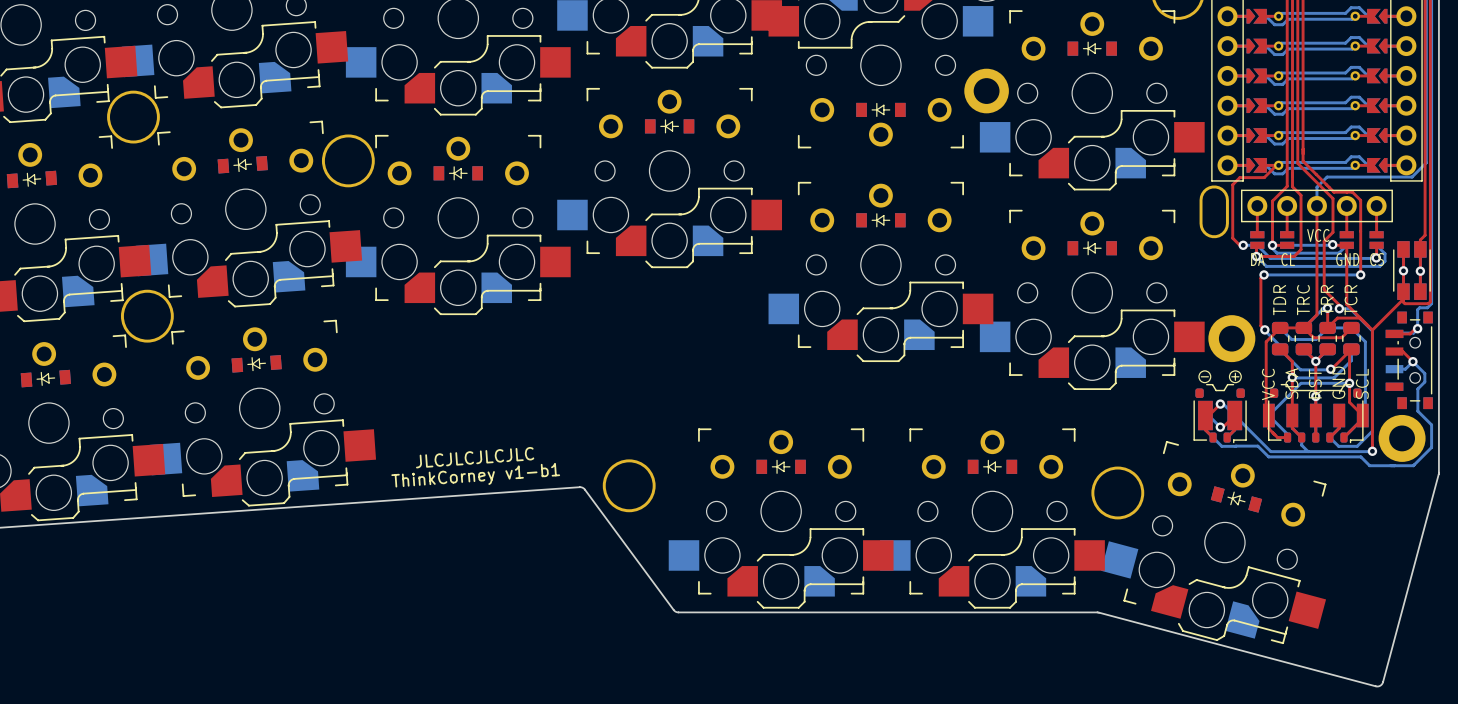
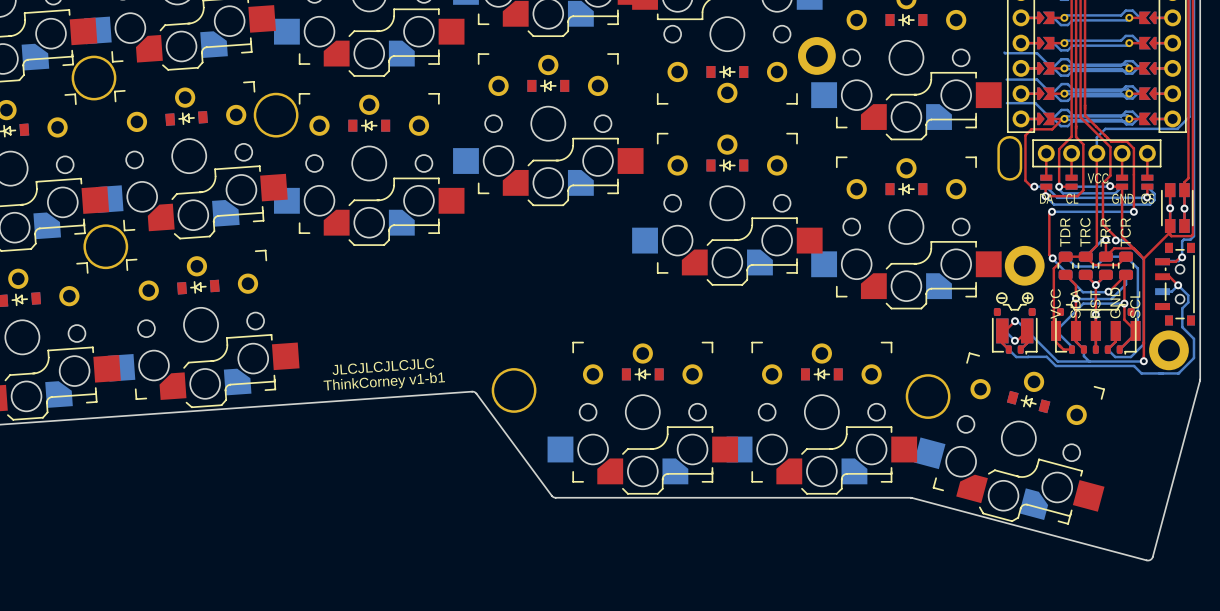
bottom track: none -> (1004, 52) (1037, 53) (1049, 66)
bottom track: none -> (1054, 66) (1061, 59) (1067, 59) (1072, 64) (1127, 64) (1129, 66)
bottom track: none -> (1064, 66) (1067, 69) (1121, 69) (1126, 73) (1132, 73) (1139, 66)
bottom track: none -> (1006, 79) (1037, 79) (1049, 91)
bottom track: none -> (1054, 91) (1061, 84) (1067, 84) (1072, 89) (1127, 89) (1129, 91)
bottom track: none -> (1064, 91) (1067, 94) (1122, 94) (1126, 98) (1132, 98) (1139, 91)
bottom track: none -> (1006, 103) (1035, 103) (1049, 117)
bottom track: none -> (1054, 117) (1061, 109) (1067, 109) (1072, 115) (1127, 115) (1129, 117)
bottom track: none -> (1064, 117) (1067, 119) (1121, 119) (1126, 124) (1132, 124) (1139, 117)

